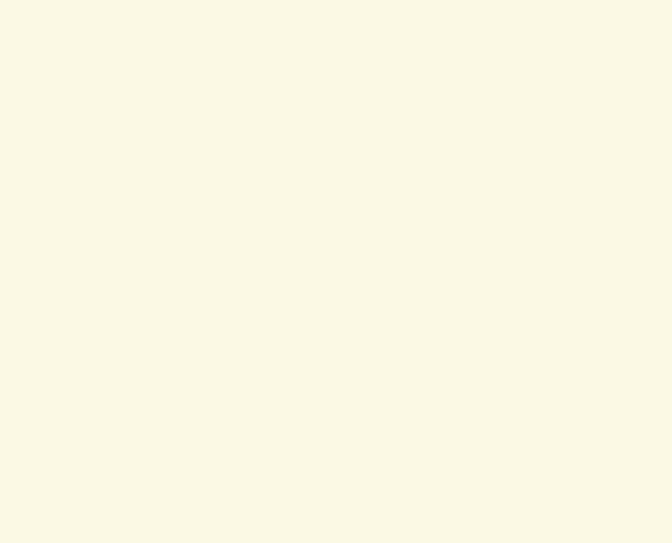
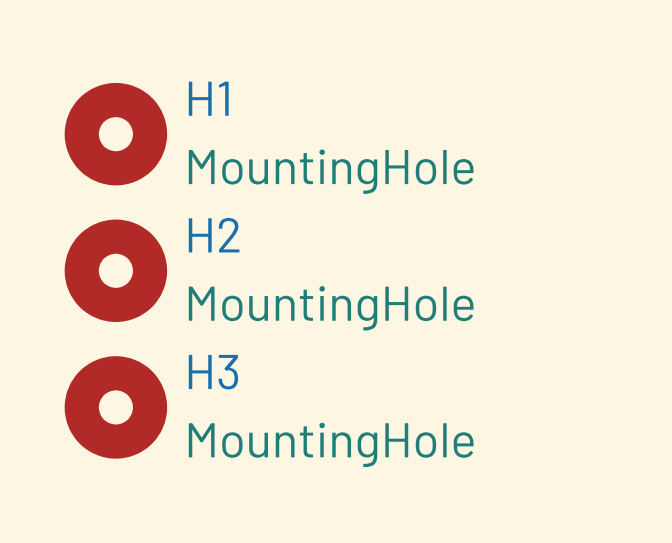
H1: none -> MountingHole (115, 134)
H2: none -> MountingHole (115, 270)
H3: none -> MountingHole (115, 407)

